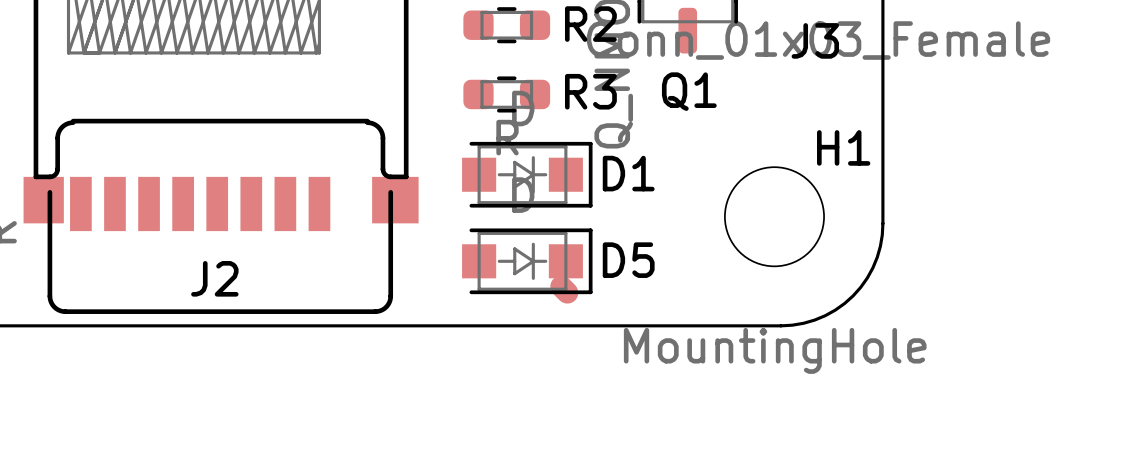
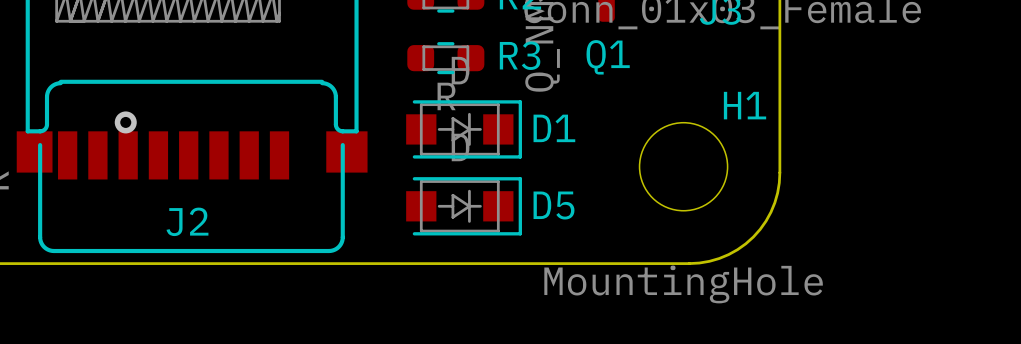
via: none -> (125, 122)
top track: (561, 286) (567, 292) -> none

